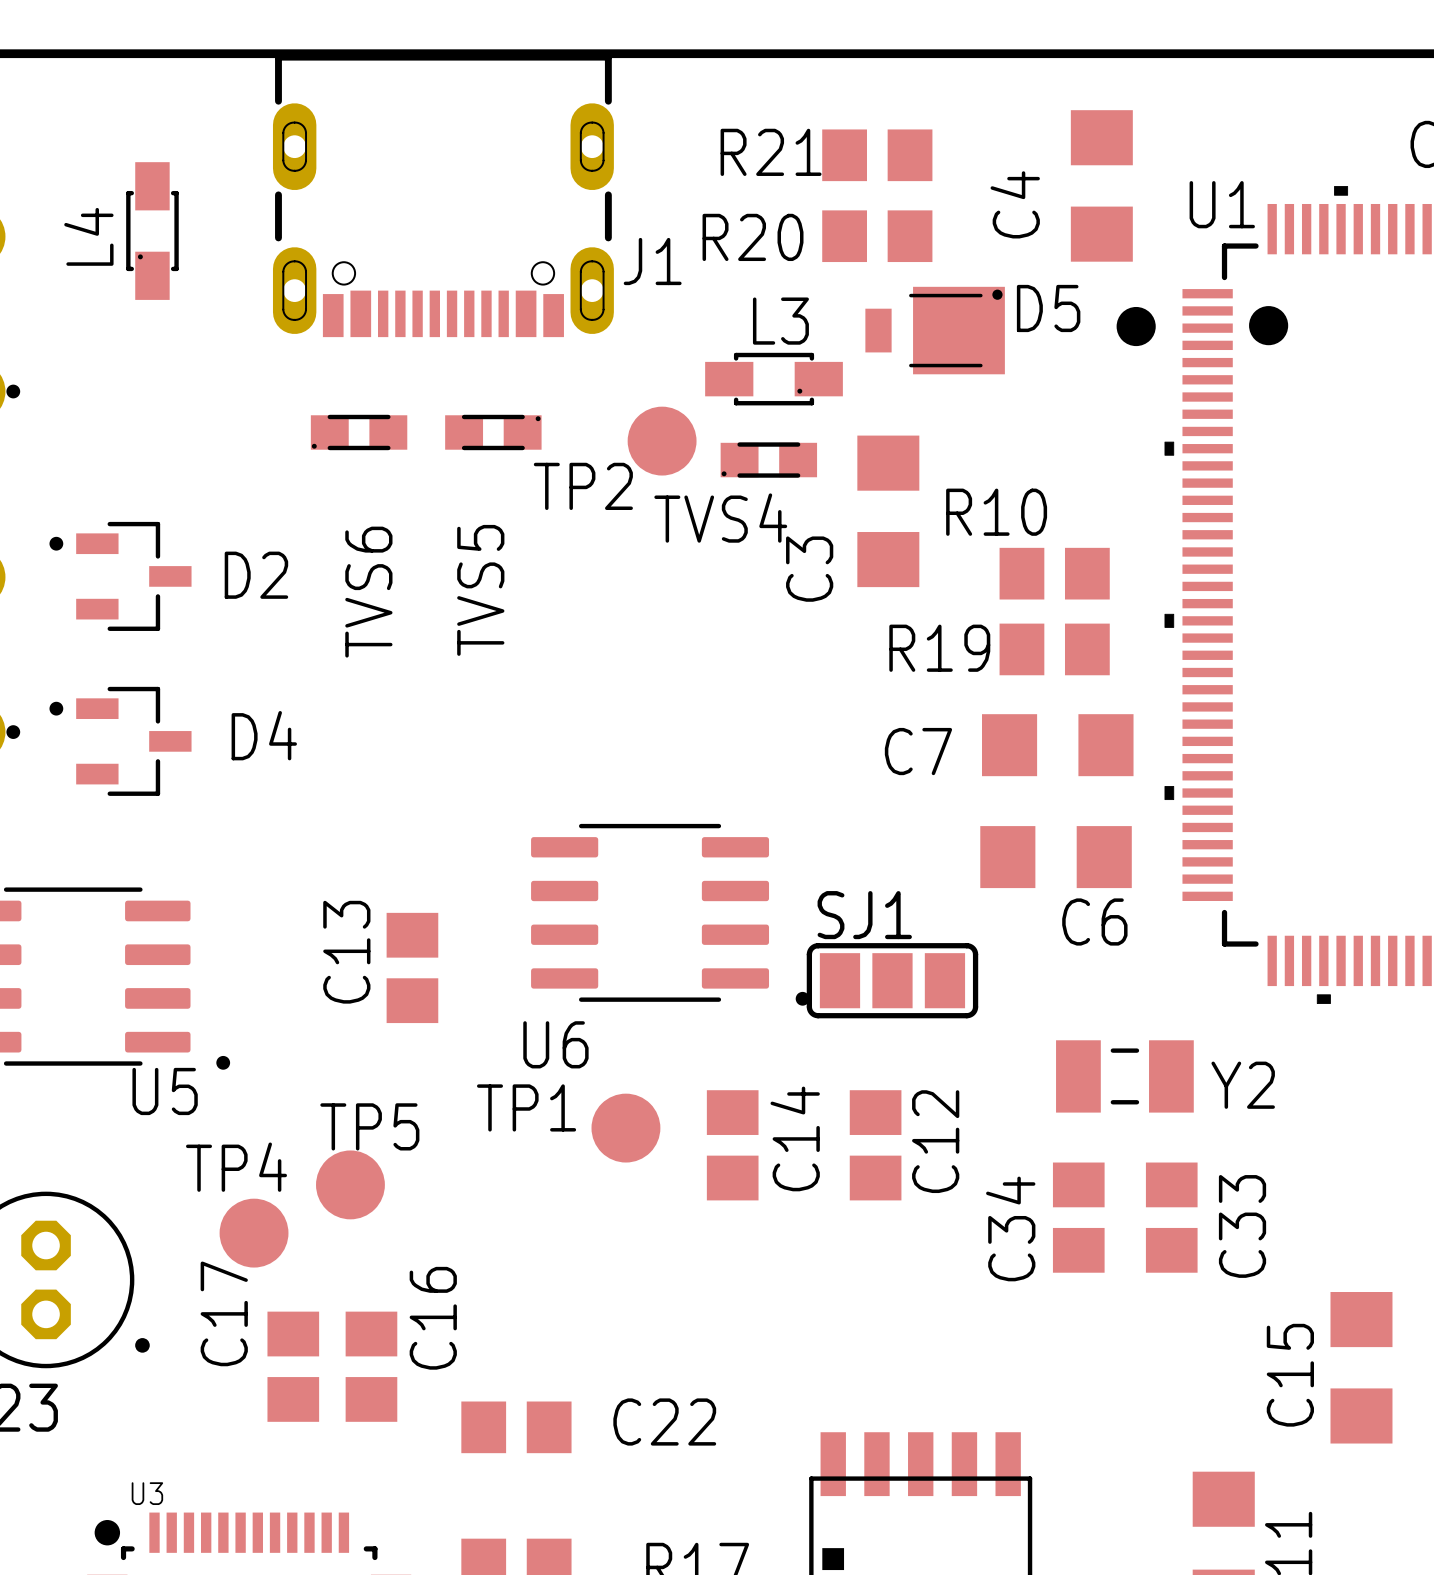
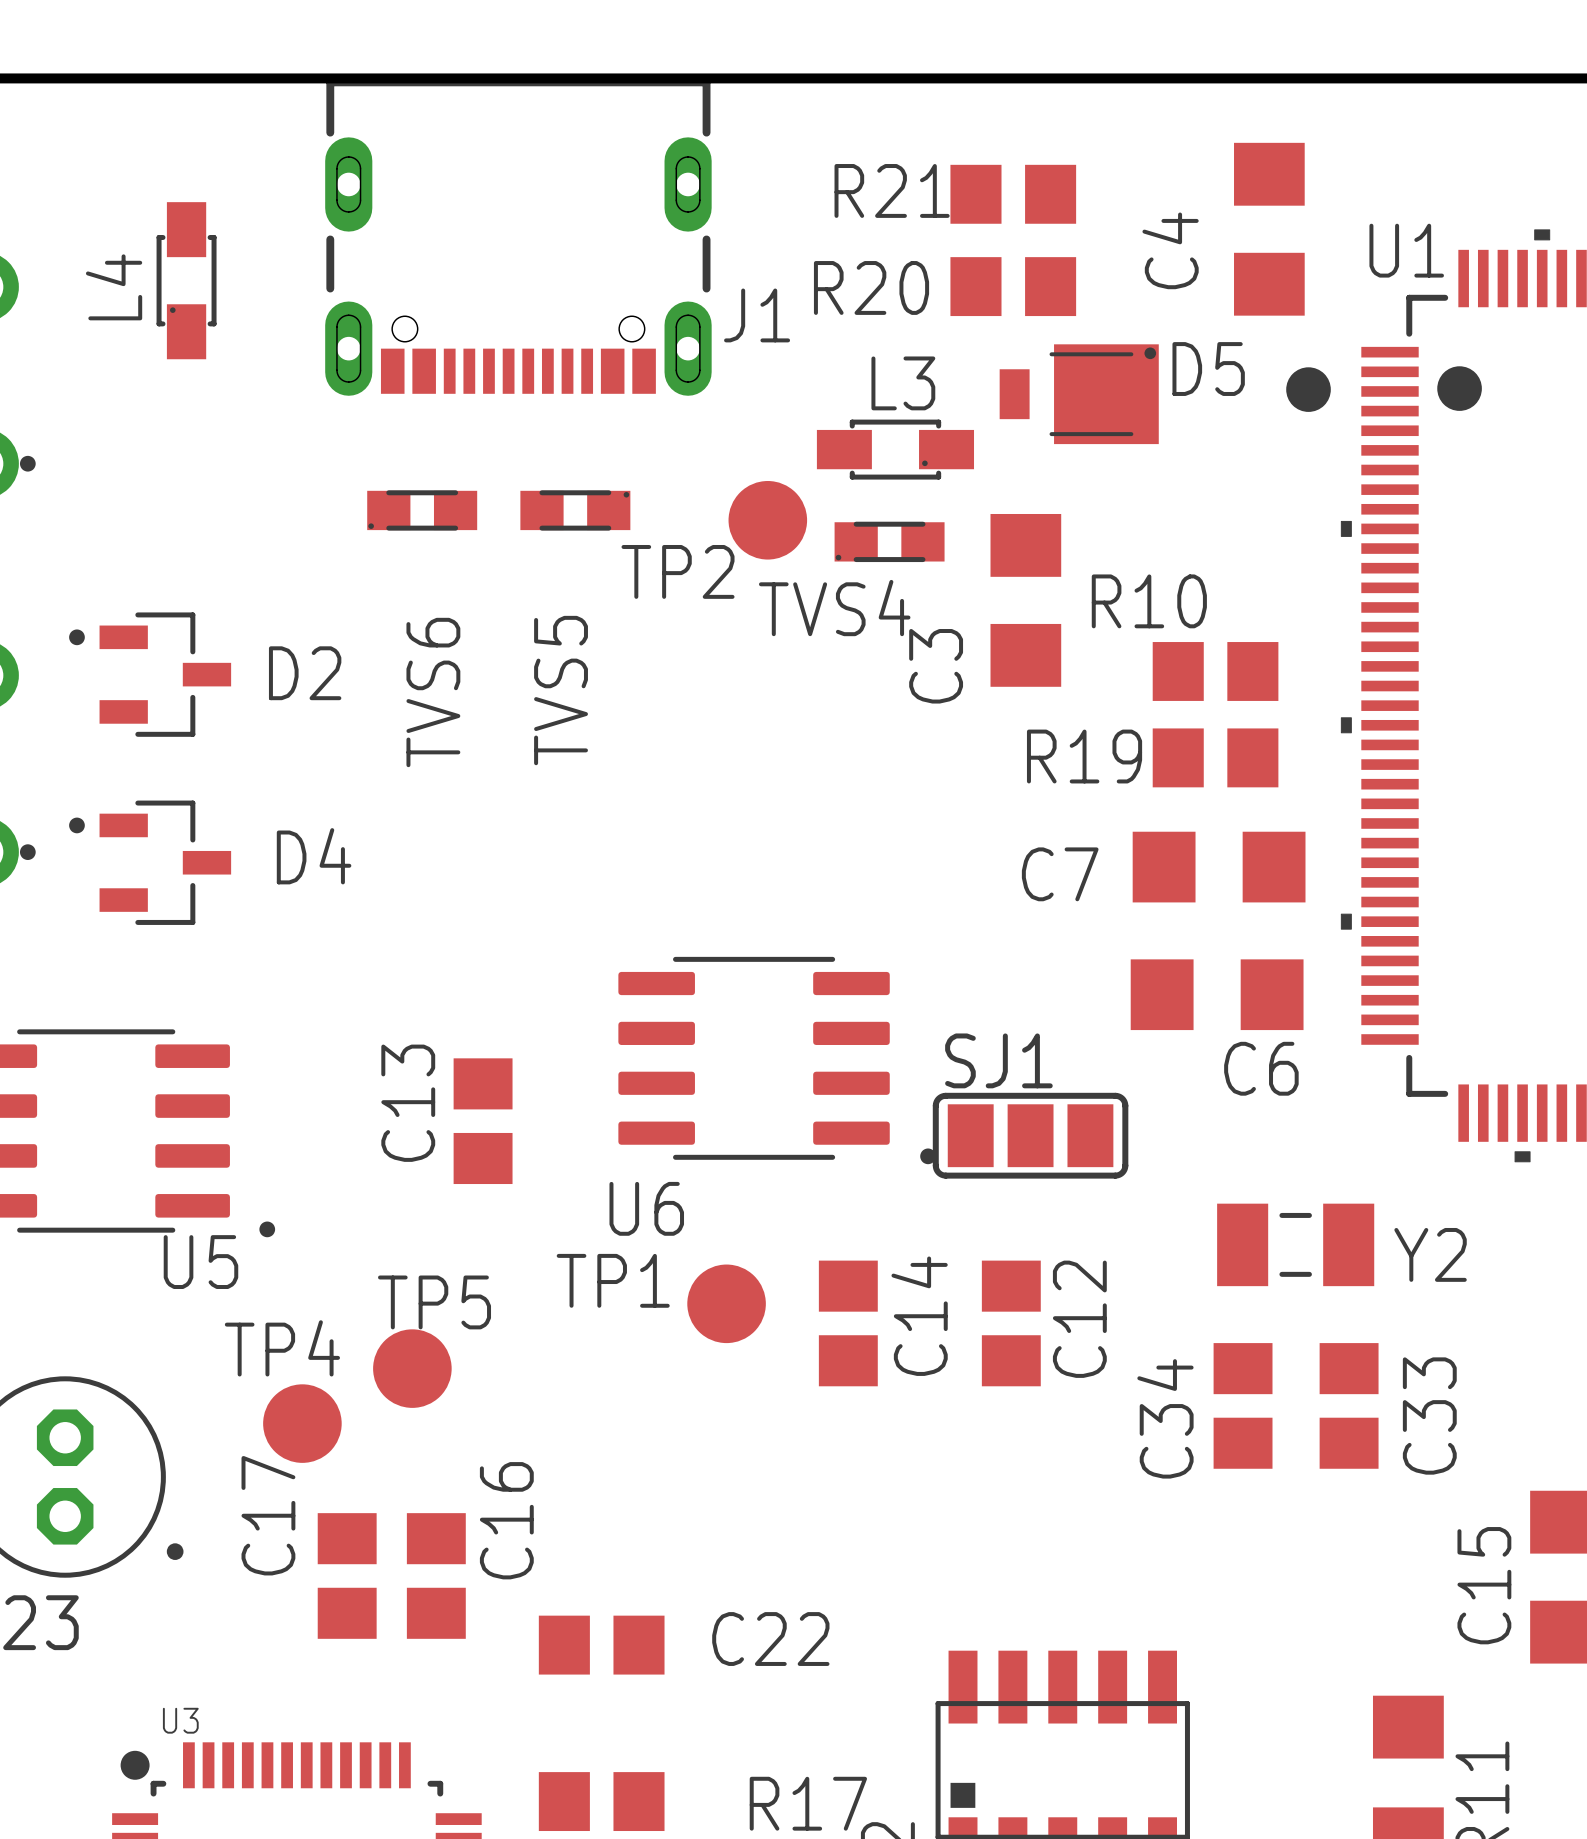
J1 footprint: [272, 53, 614, 338] -> [325, 78, 712, 396]

